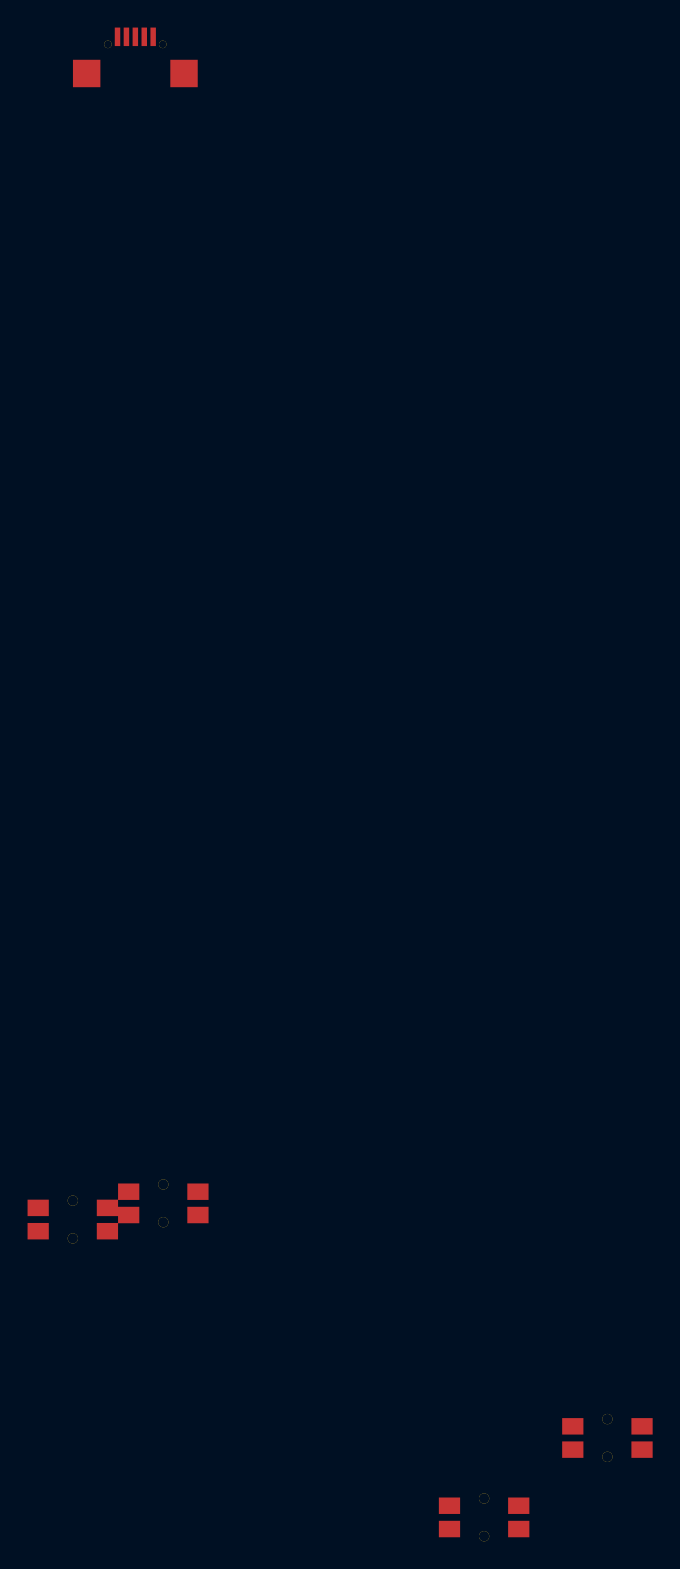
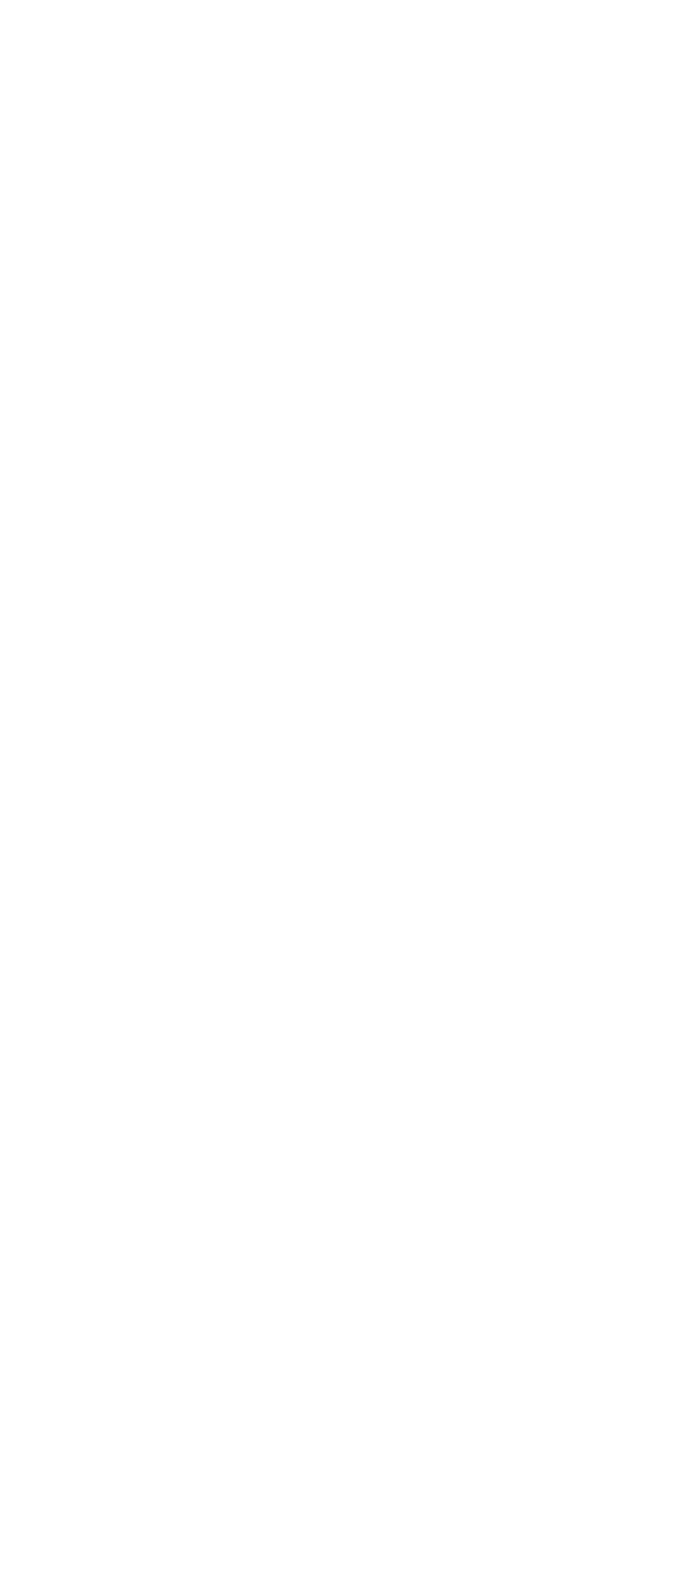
part: (135, 57) -> none
part: (163, 1203) -> none
part: (72, 1219) -> none
part: (607, 1437) -> none
part: (484, 1517) -> none

